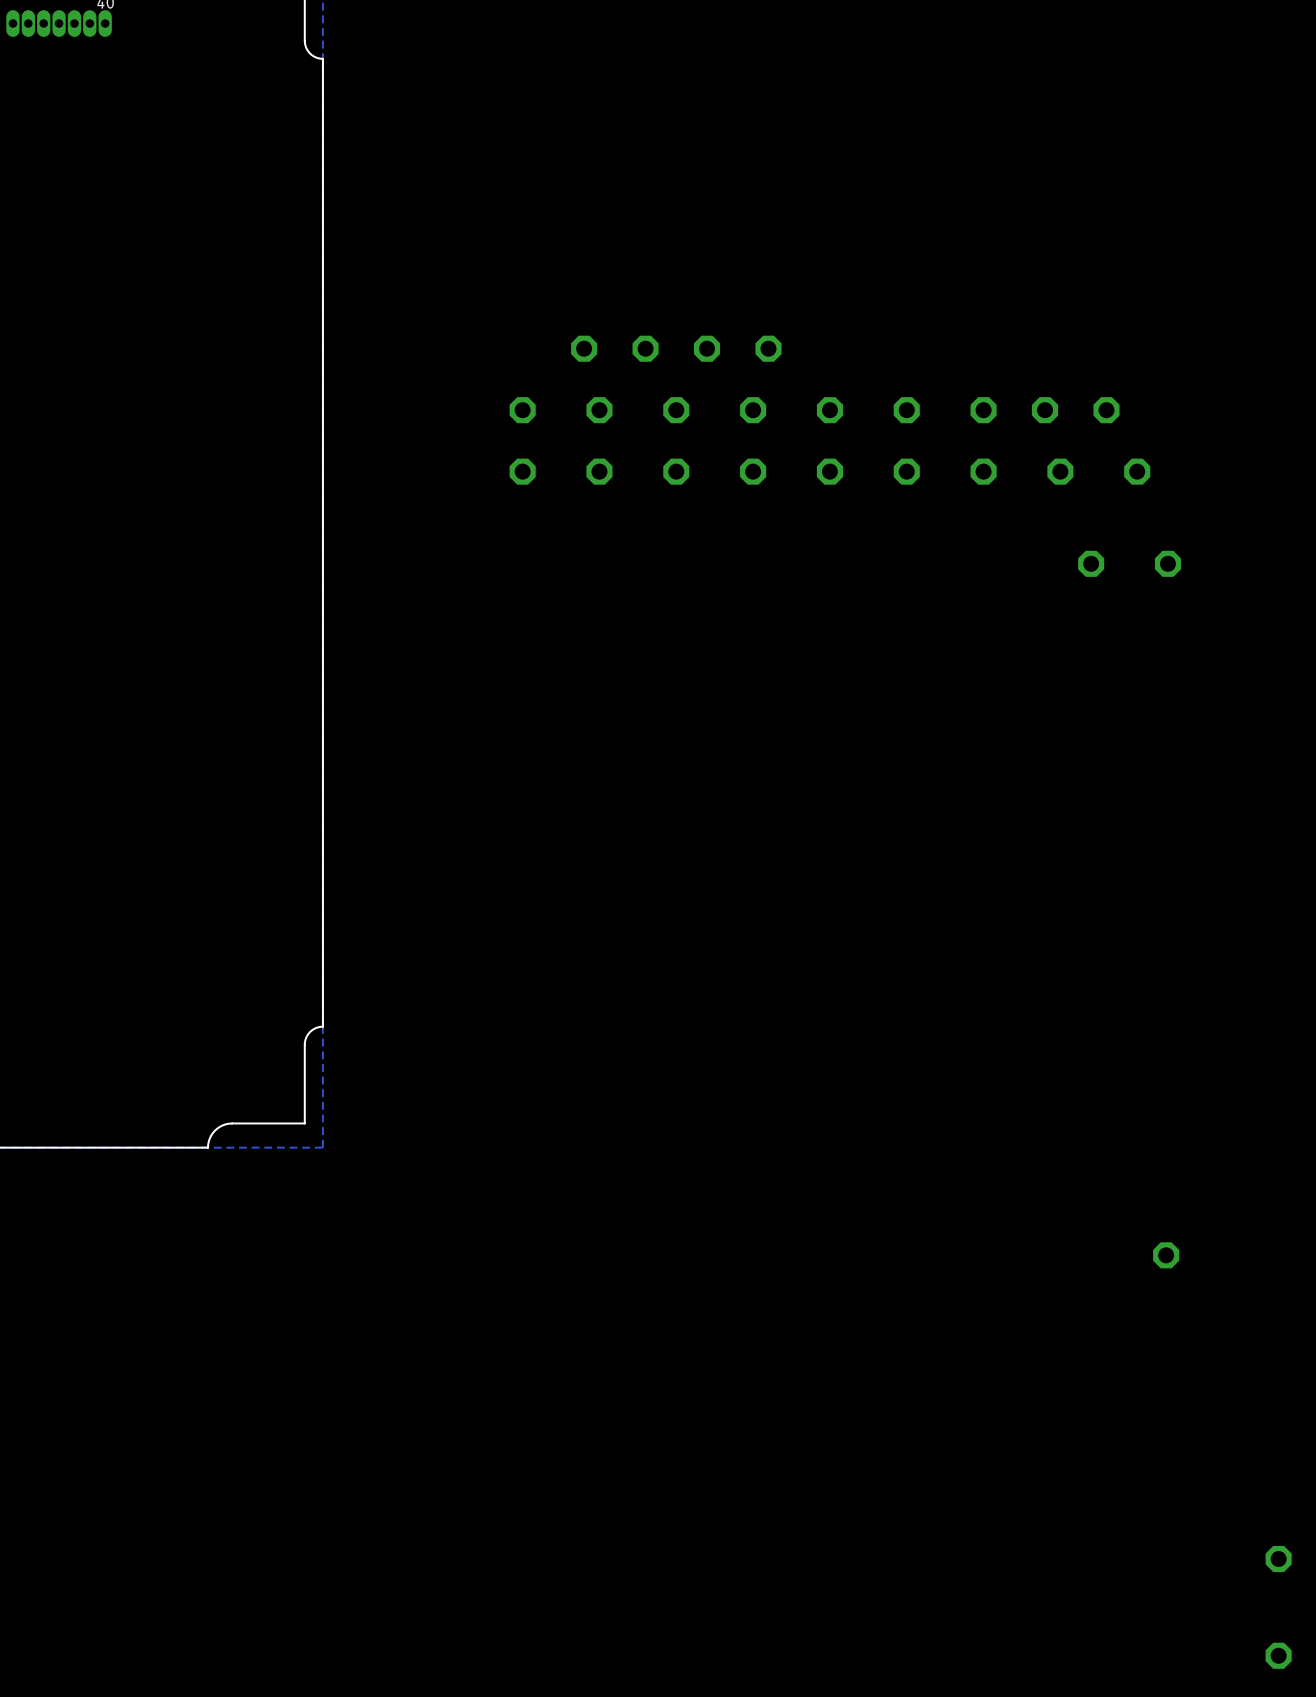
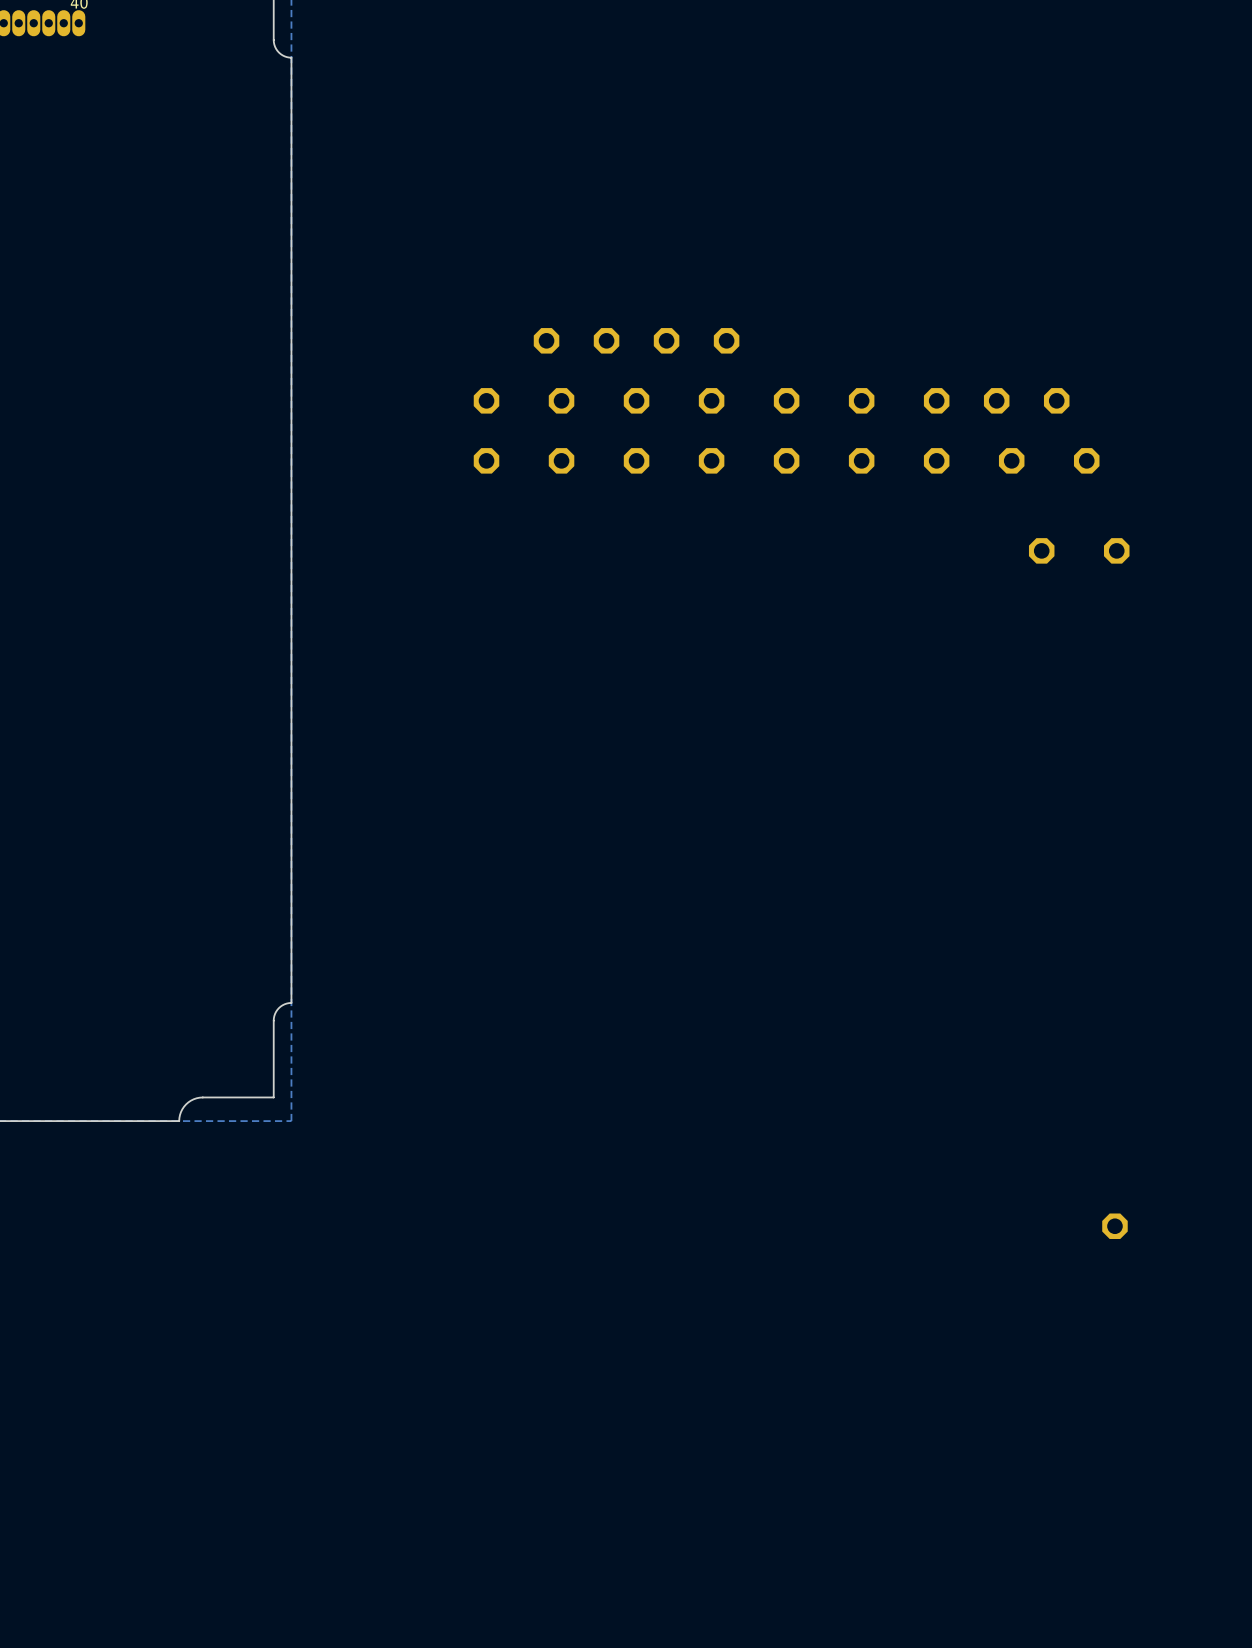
part: (1278, 1558) -> none
part: (1278, 1655) -> none

